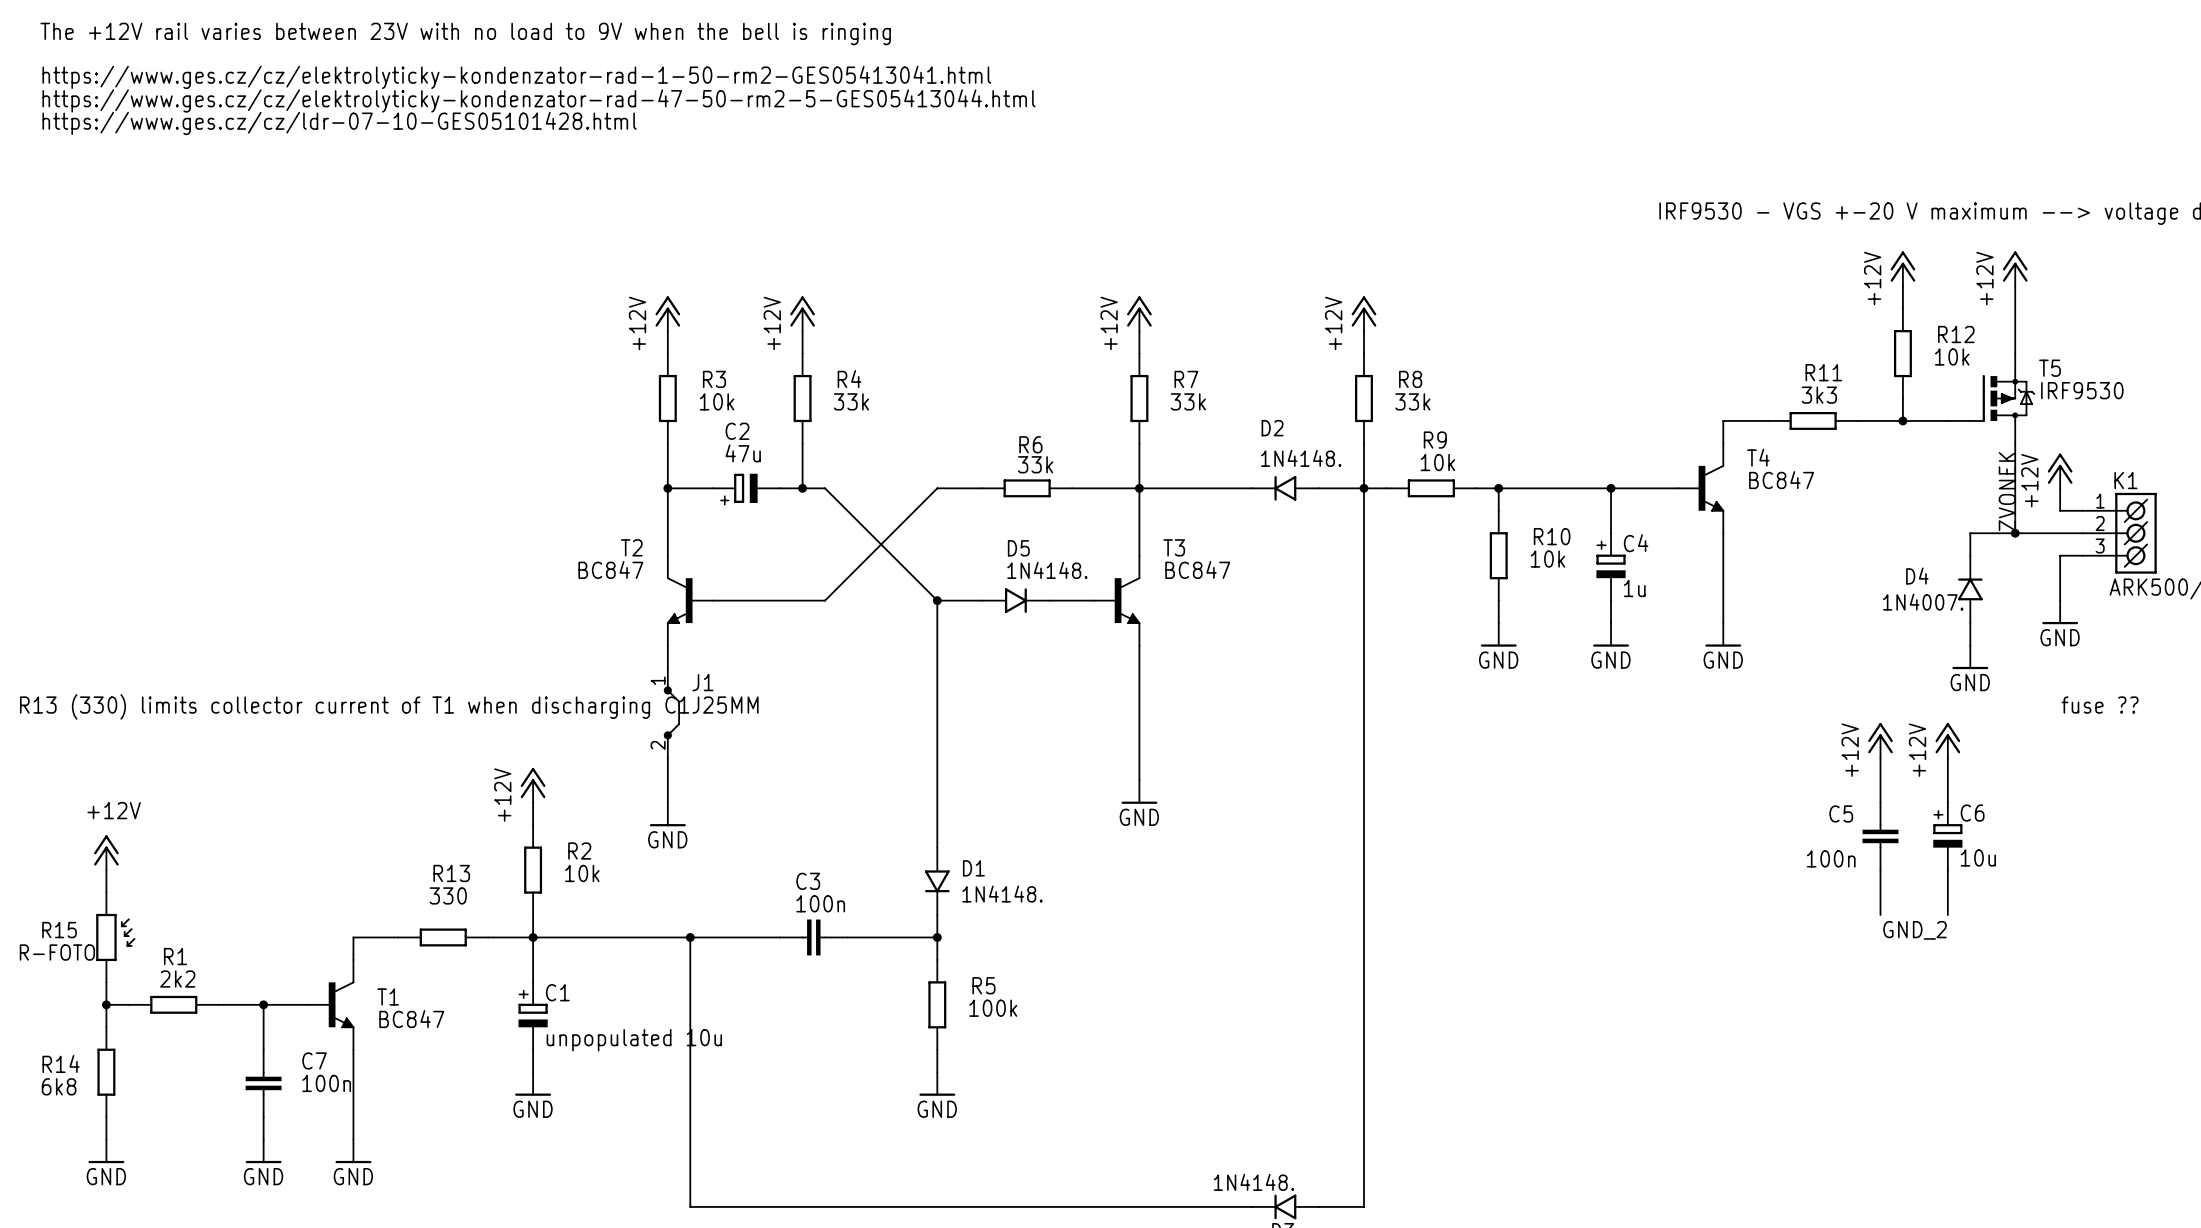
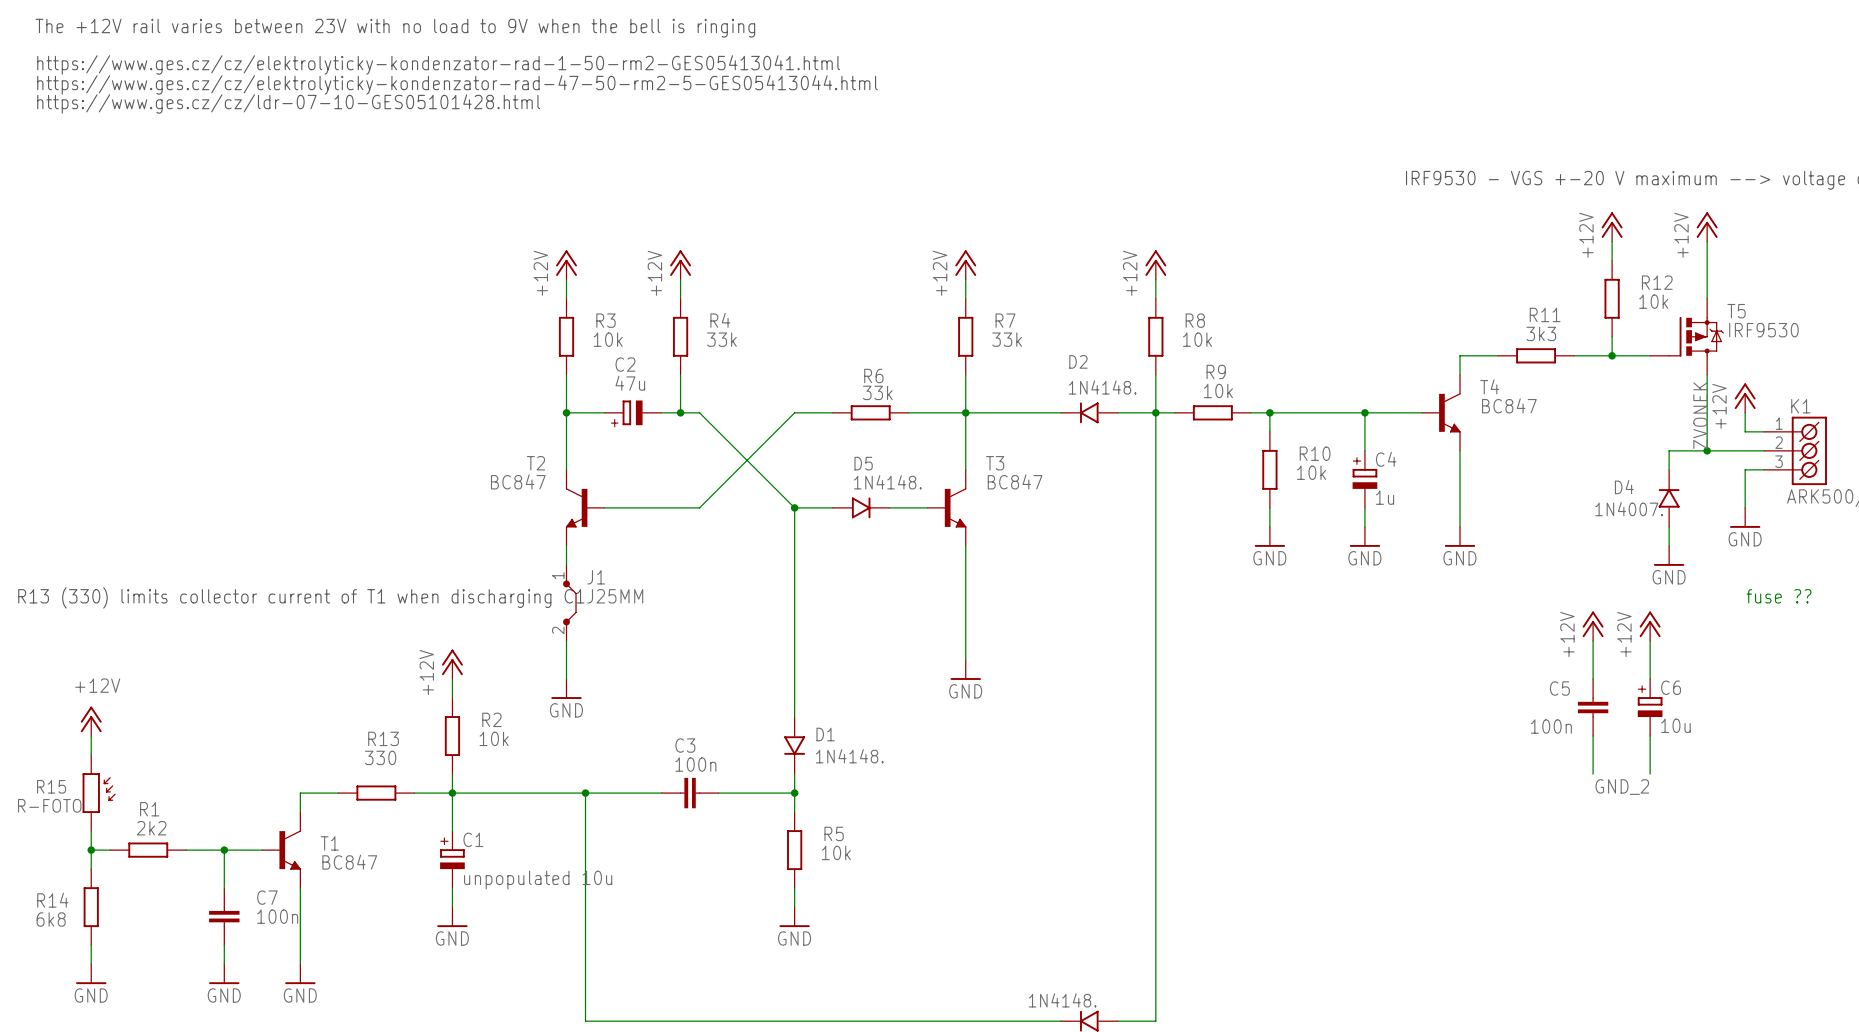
R8 value: 33k (1412, 401) -> 10k (1197, 339)
R5 value: 100k (993, 1008) -> 10k (836, 852)

